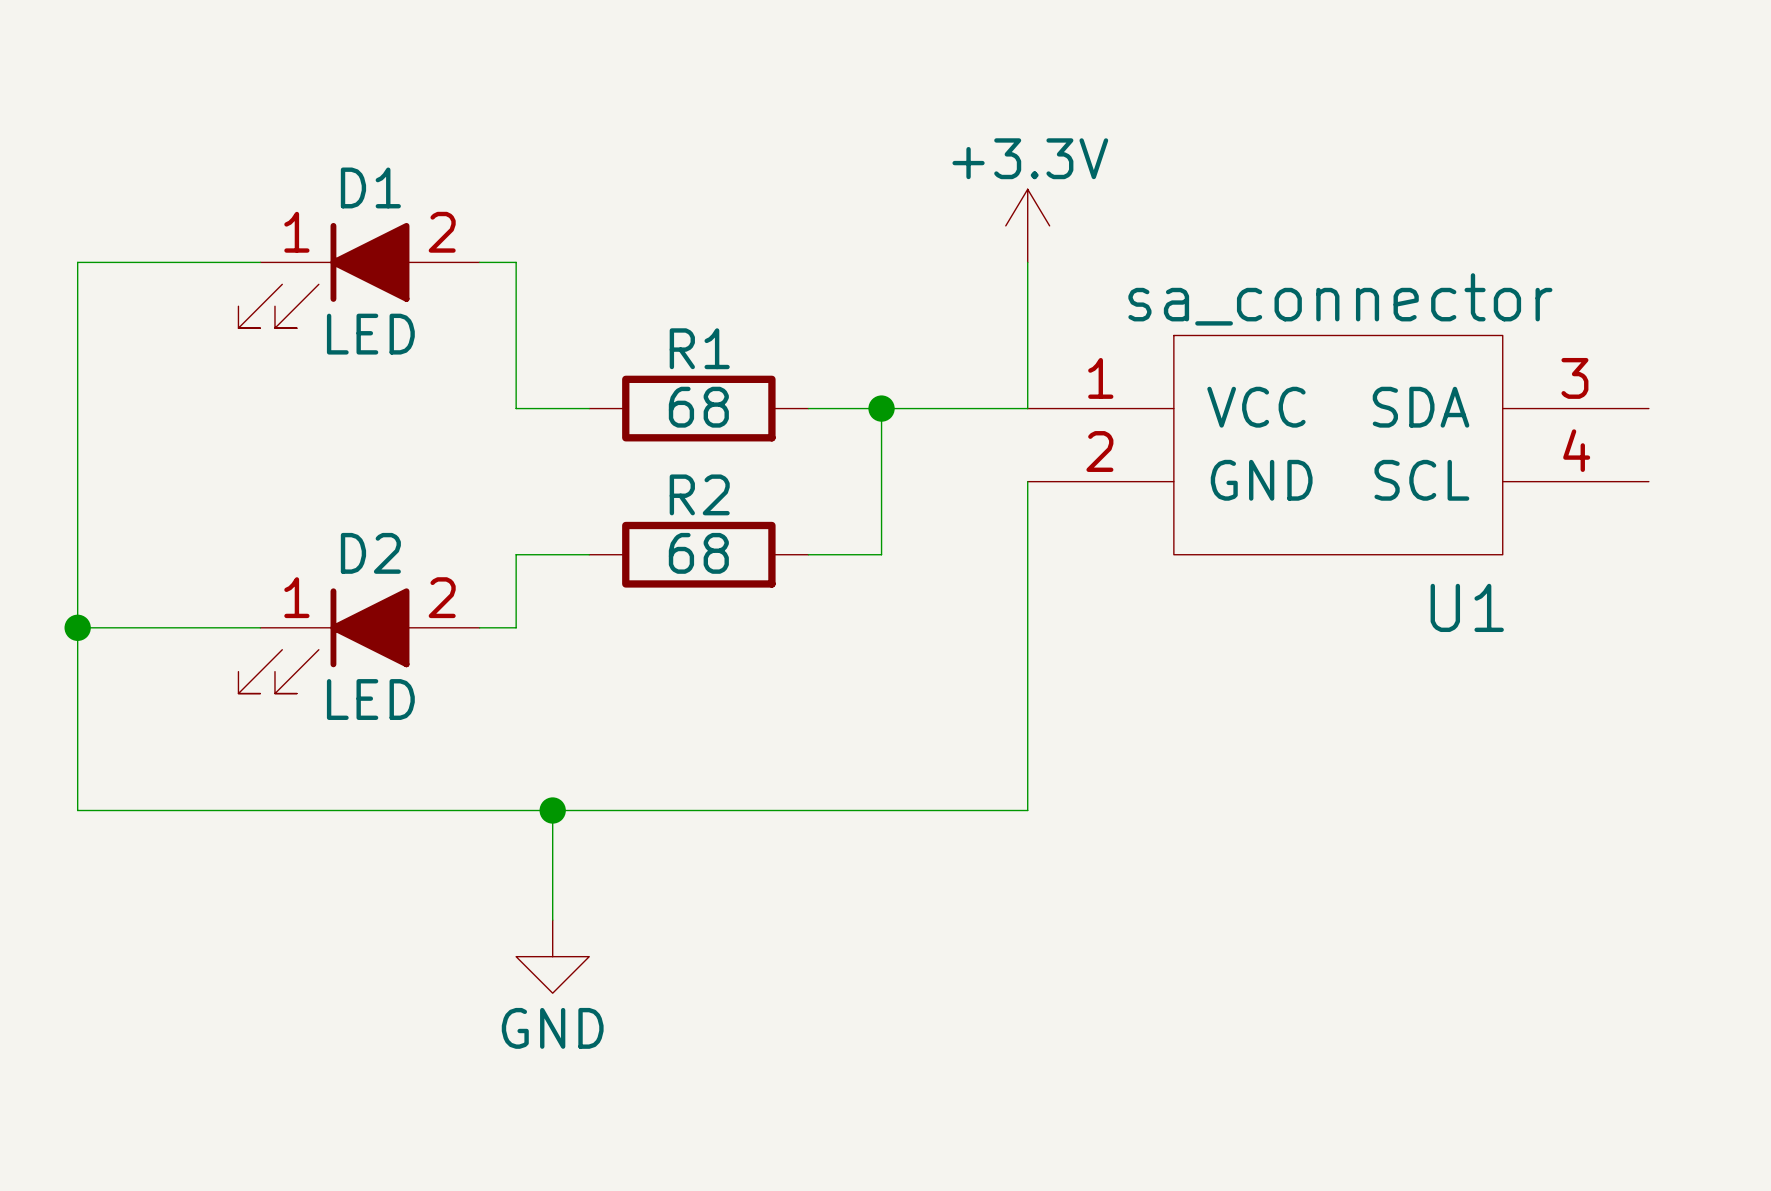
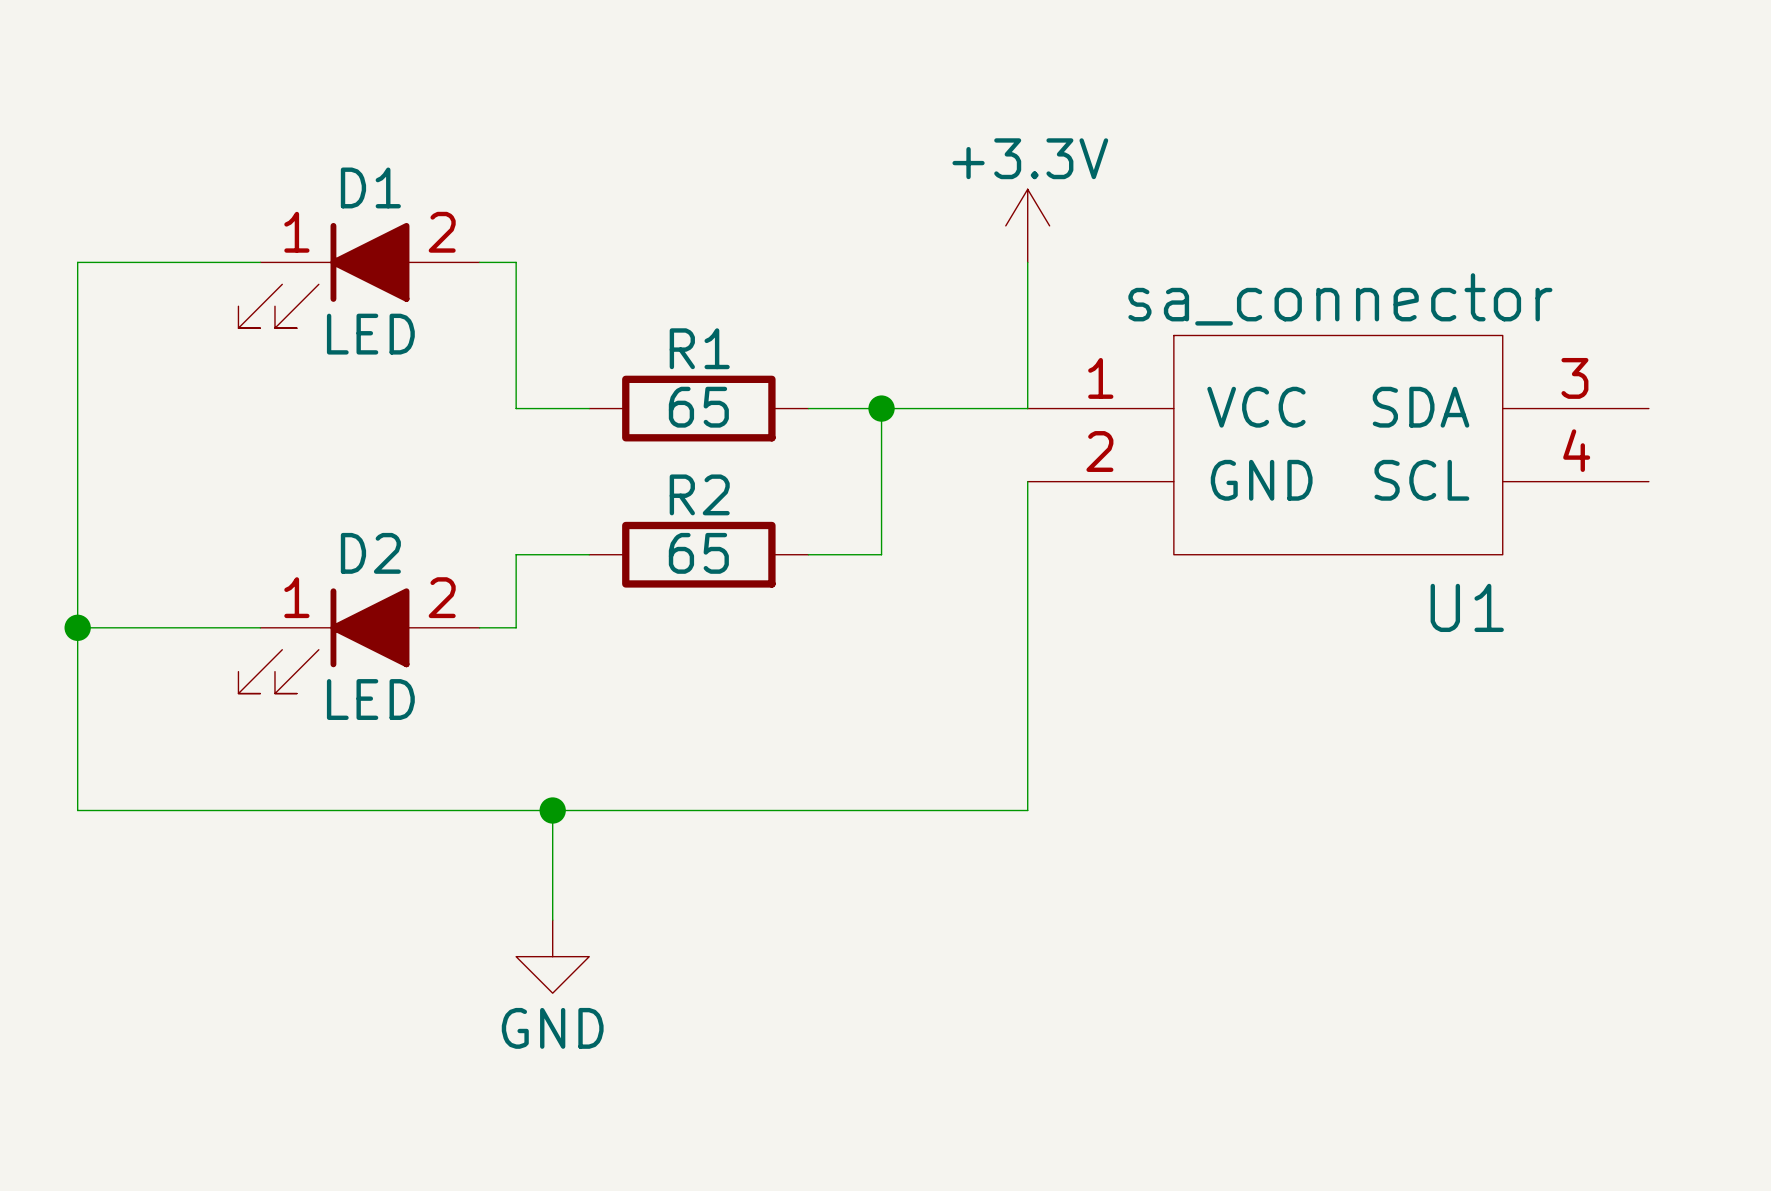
R1 value: 68 (698, 407) -> 65 (698, 407)
R2 value: 68 (698, 553) -> 65 (698, 553)

